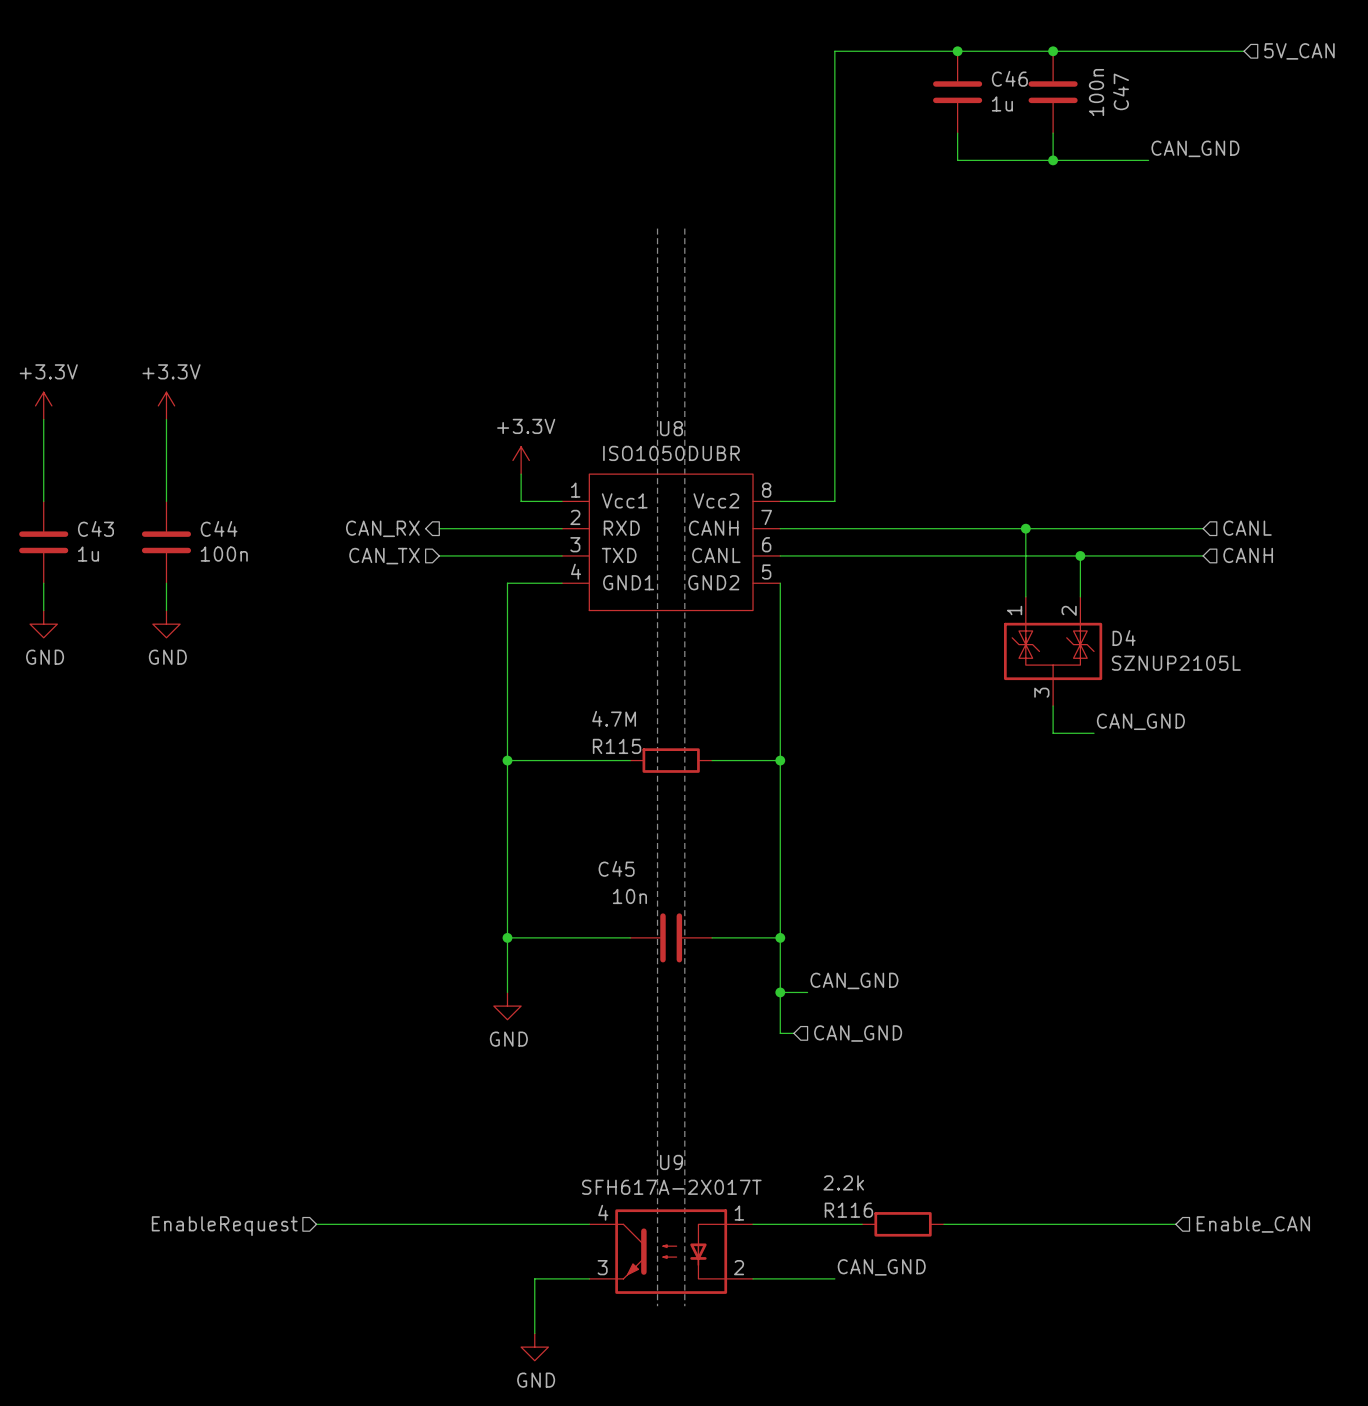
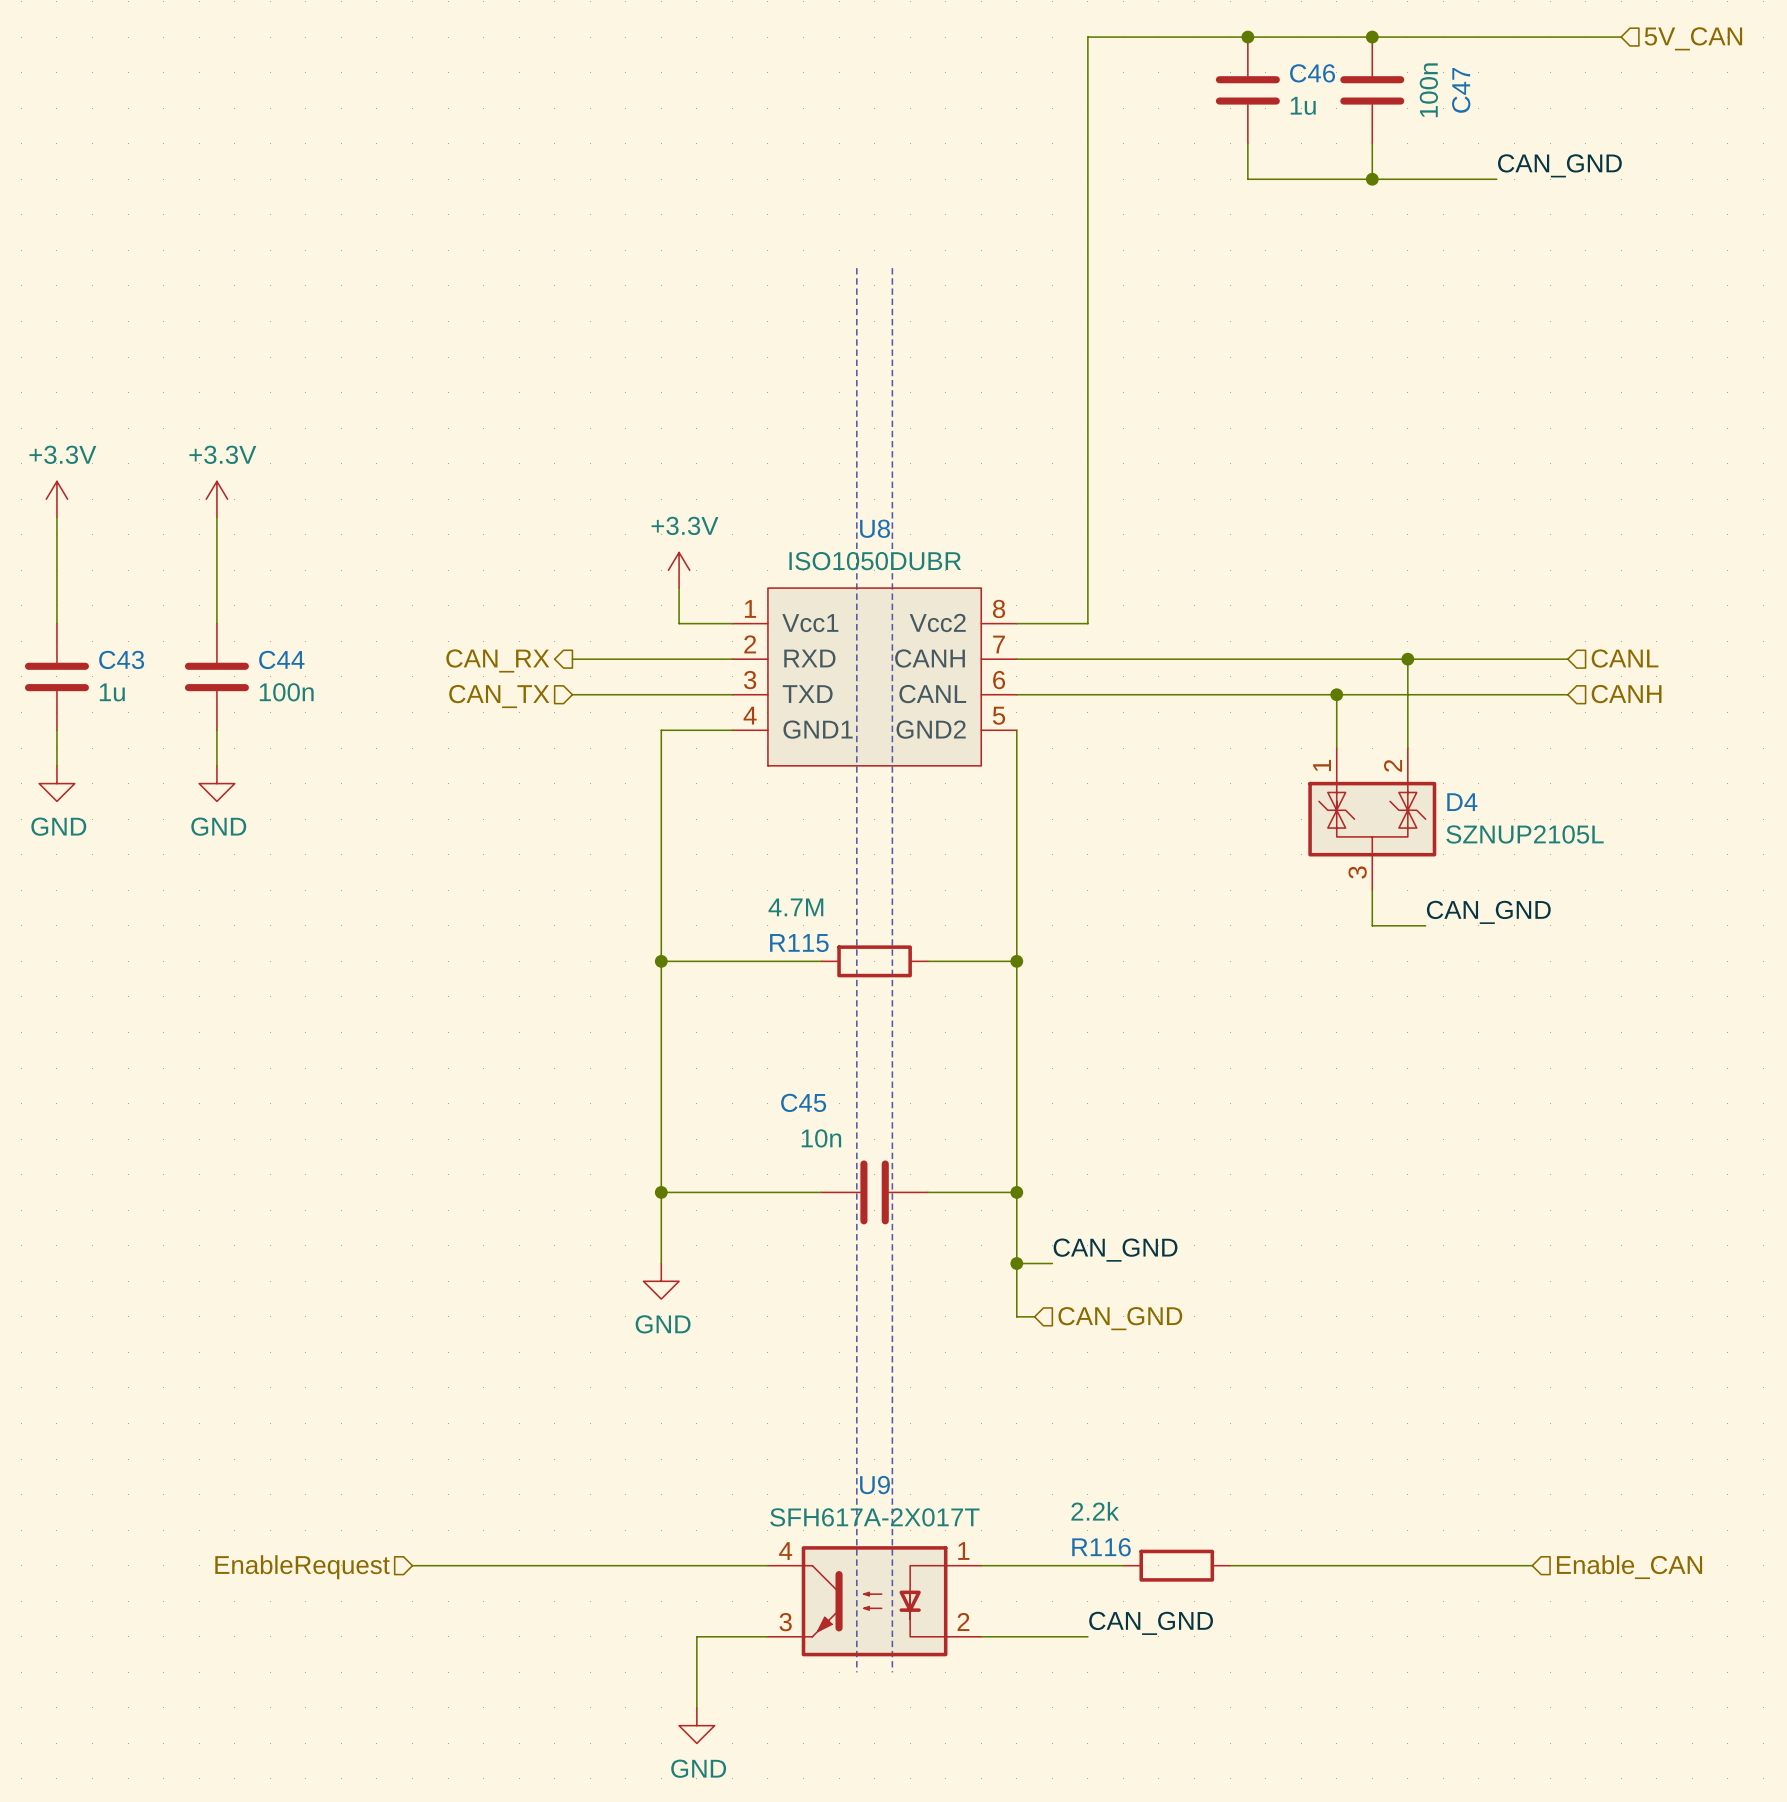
wire: (1025, 528) (1025, 555) -> (1407, 659) (1407, 694)
junction: (1025, 528) -> none
junction: none -> (1407, 659)
junction: none -> (1336, 694)
junction: (1080, 555) -> none

